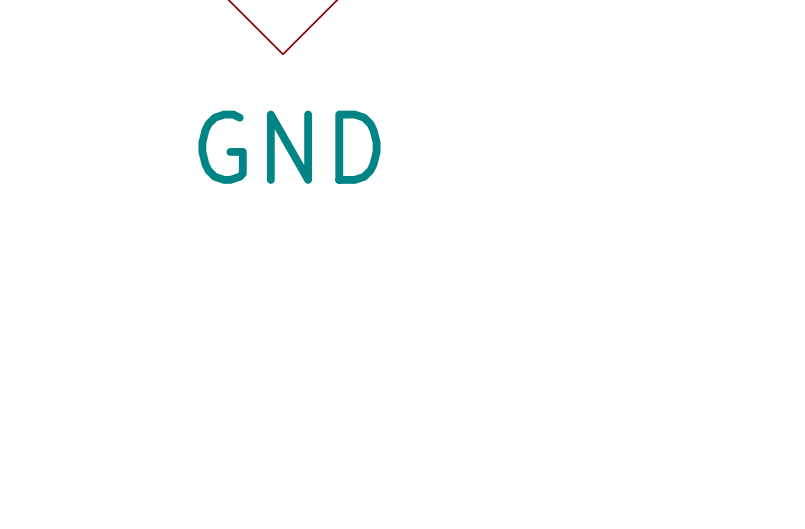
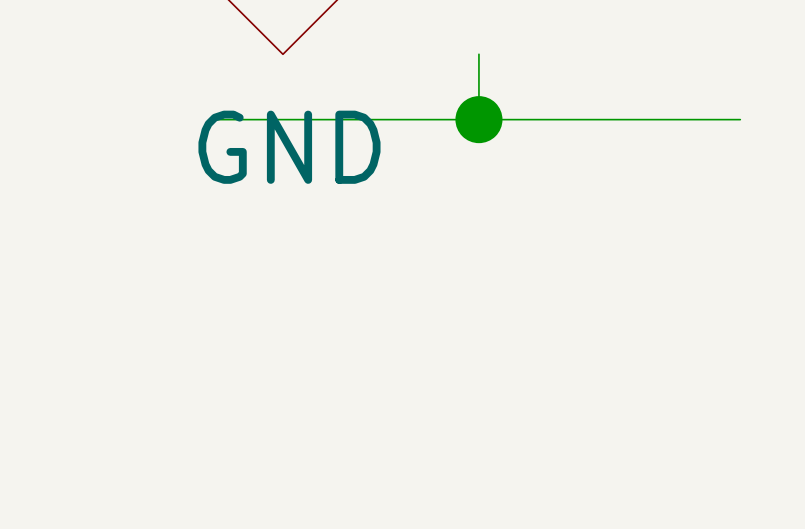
wire: none -> (478, 54) (478, 119)
wire: none -> (217, 119) (740, 119)
junction: none -> (478, 119)

